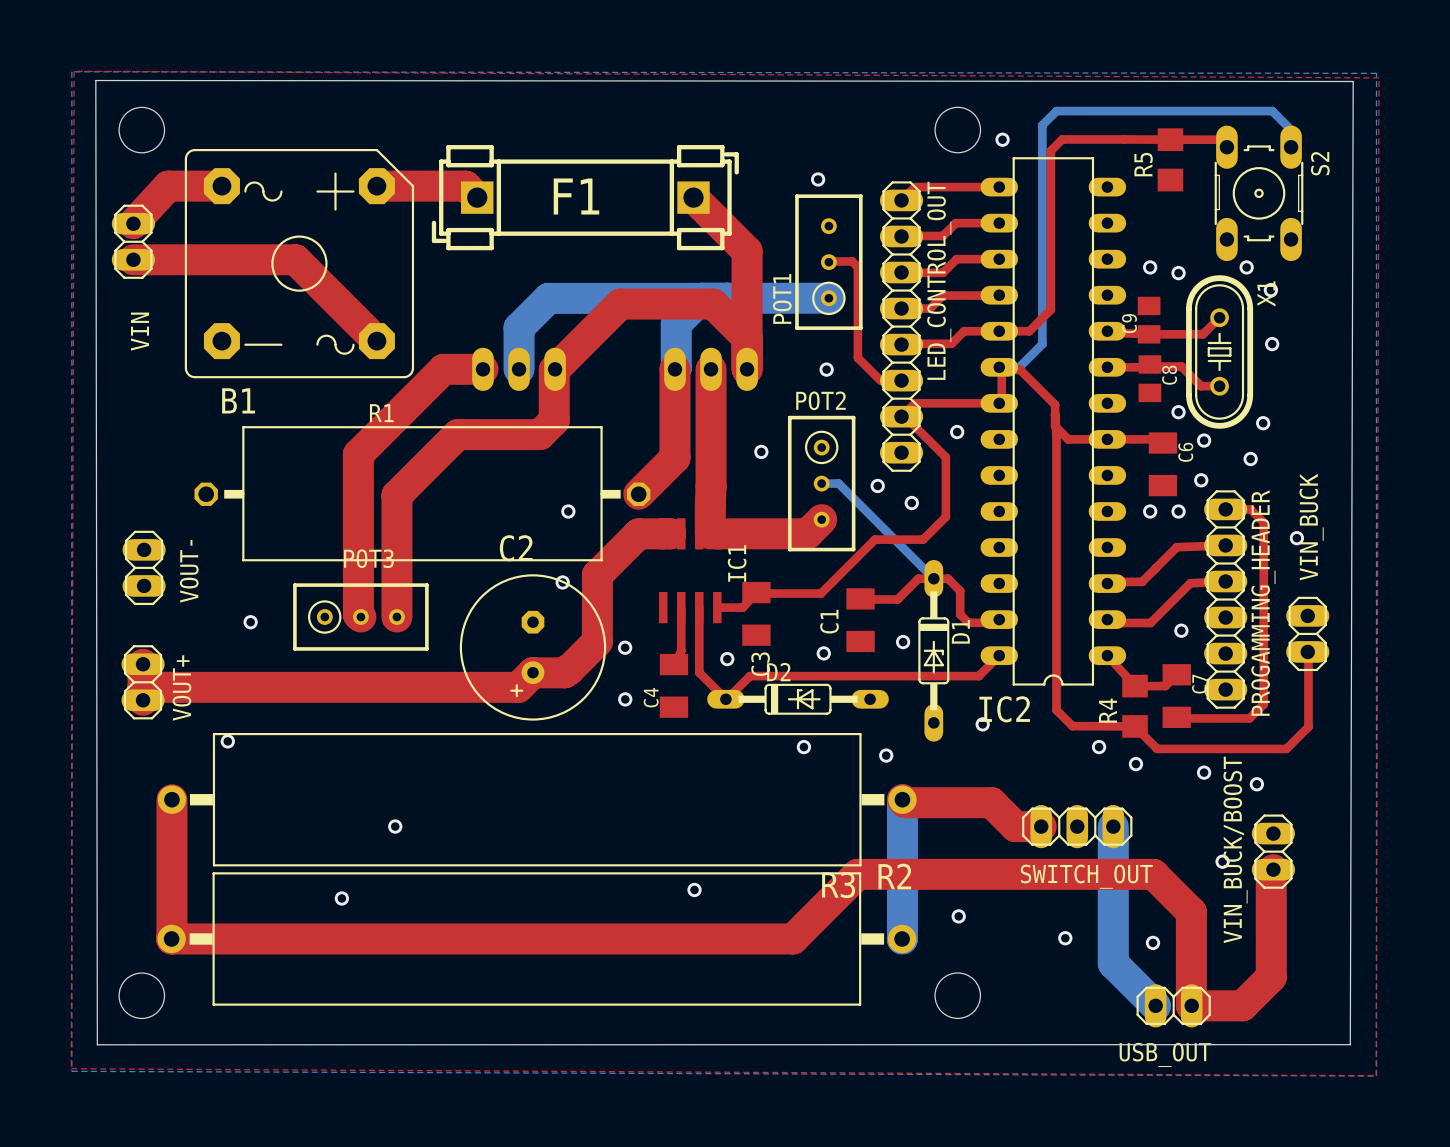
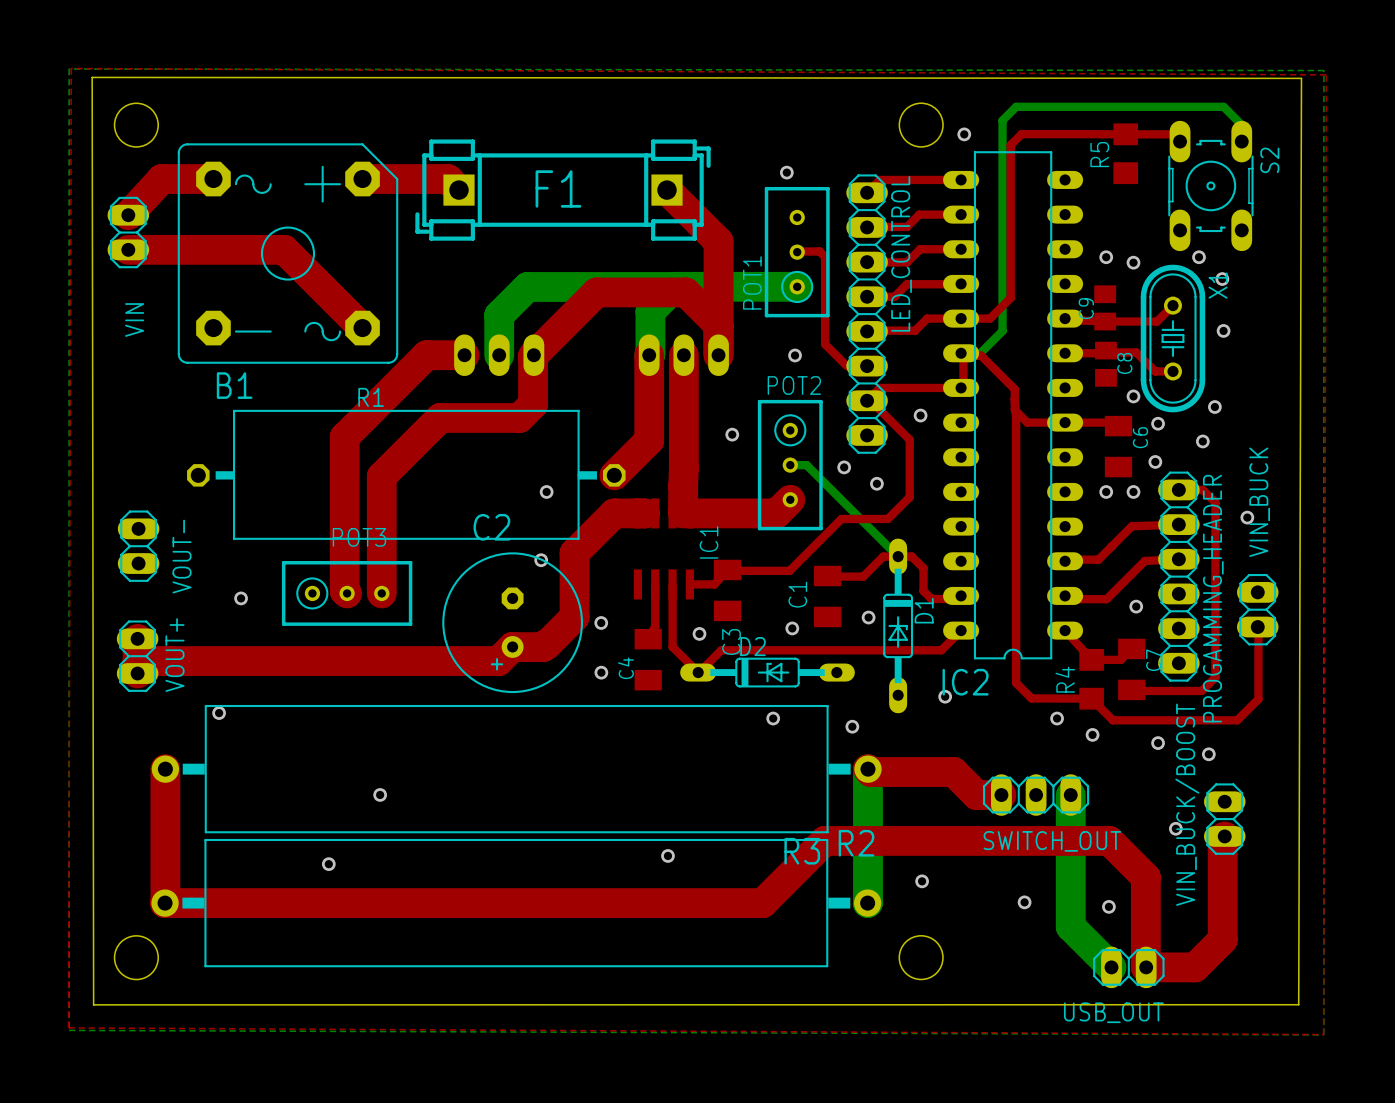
LED_CONTROL_OUT name: LED_CONTROL_OUT (939, 280) -> LED_CONTROL (901, 253)

